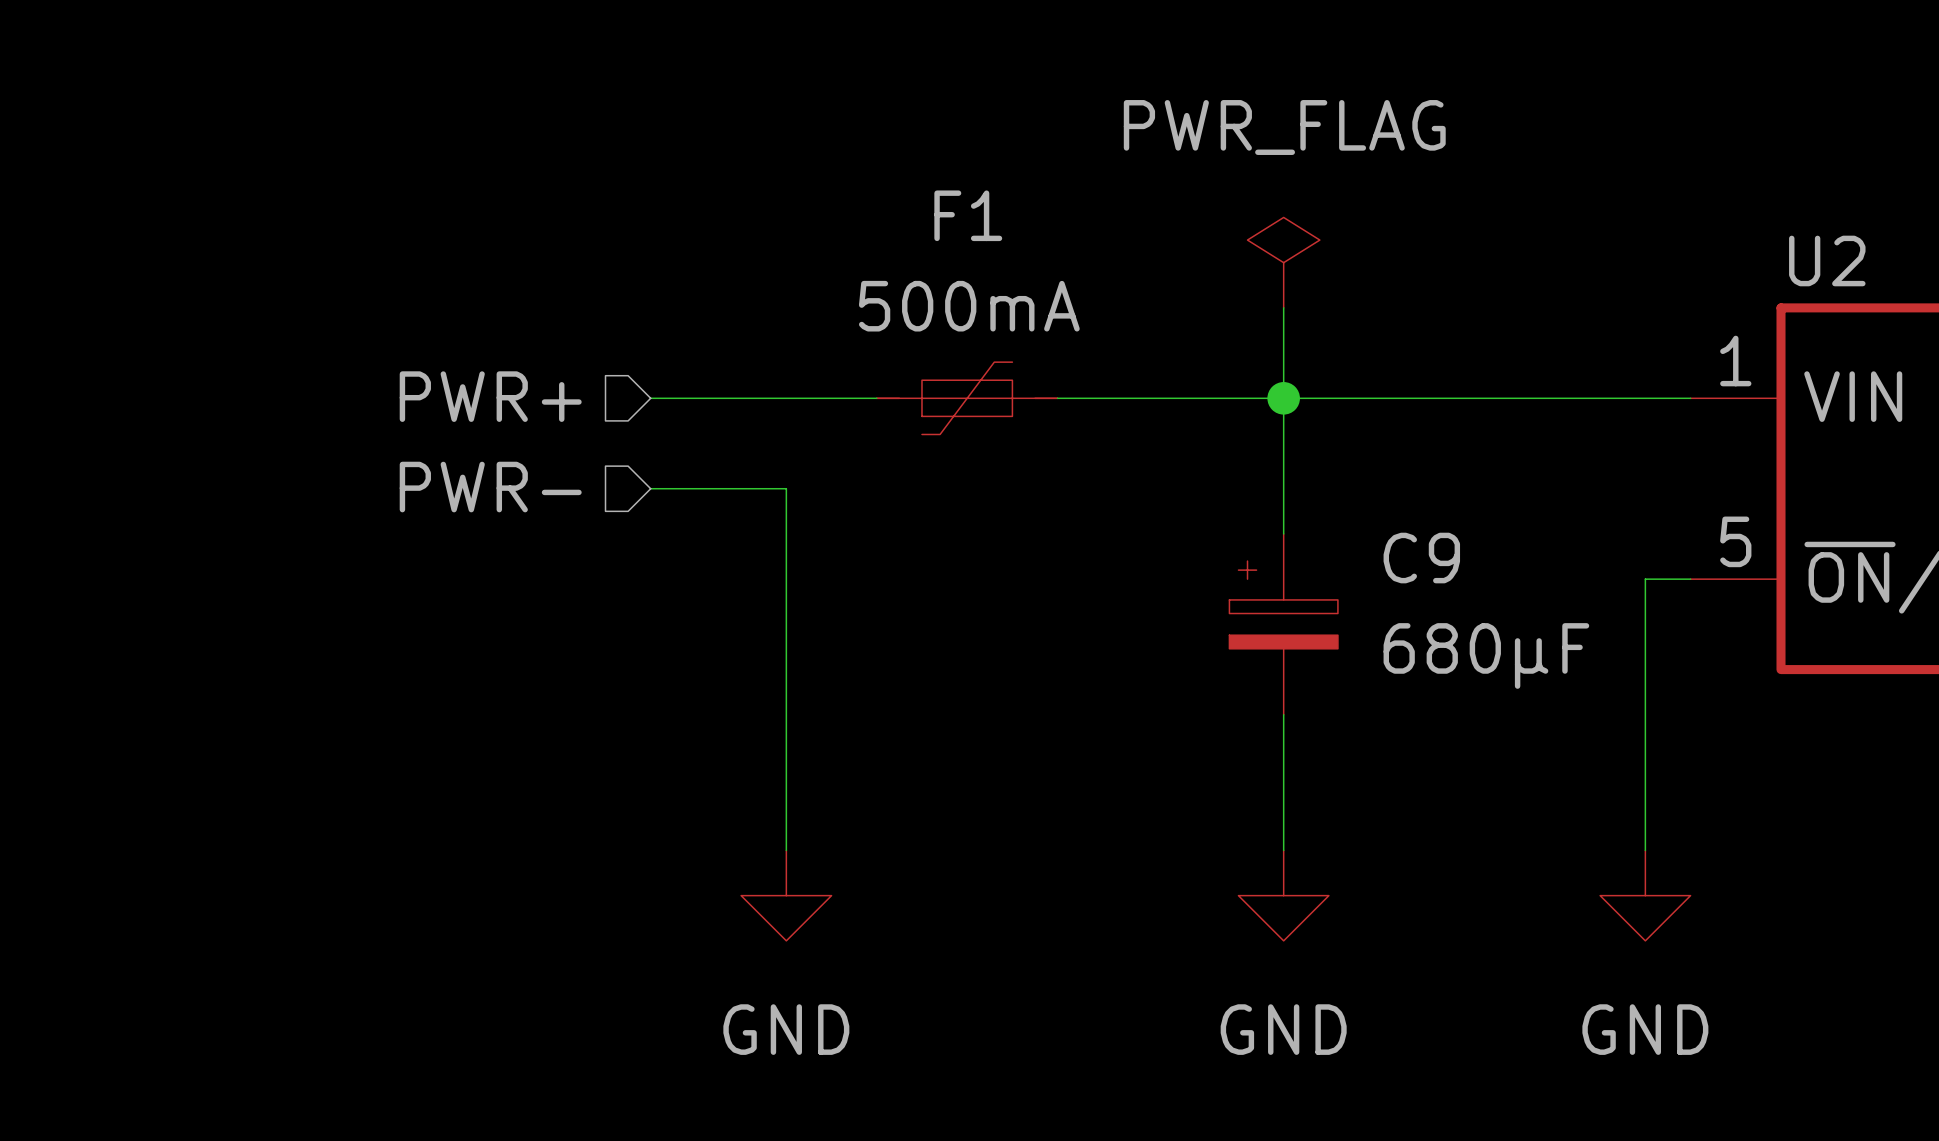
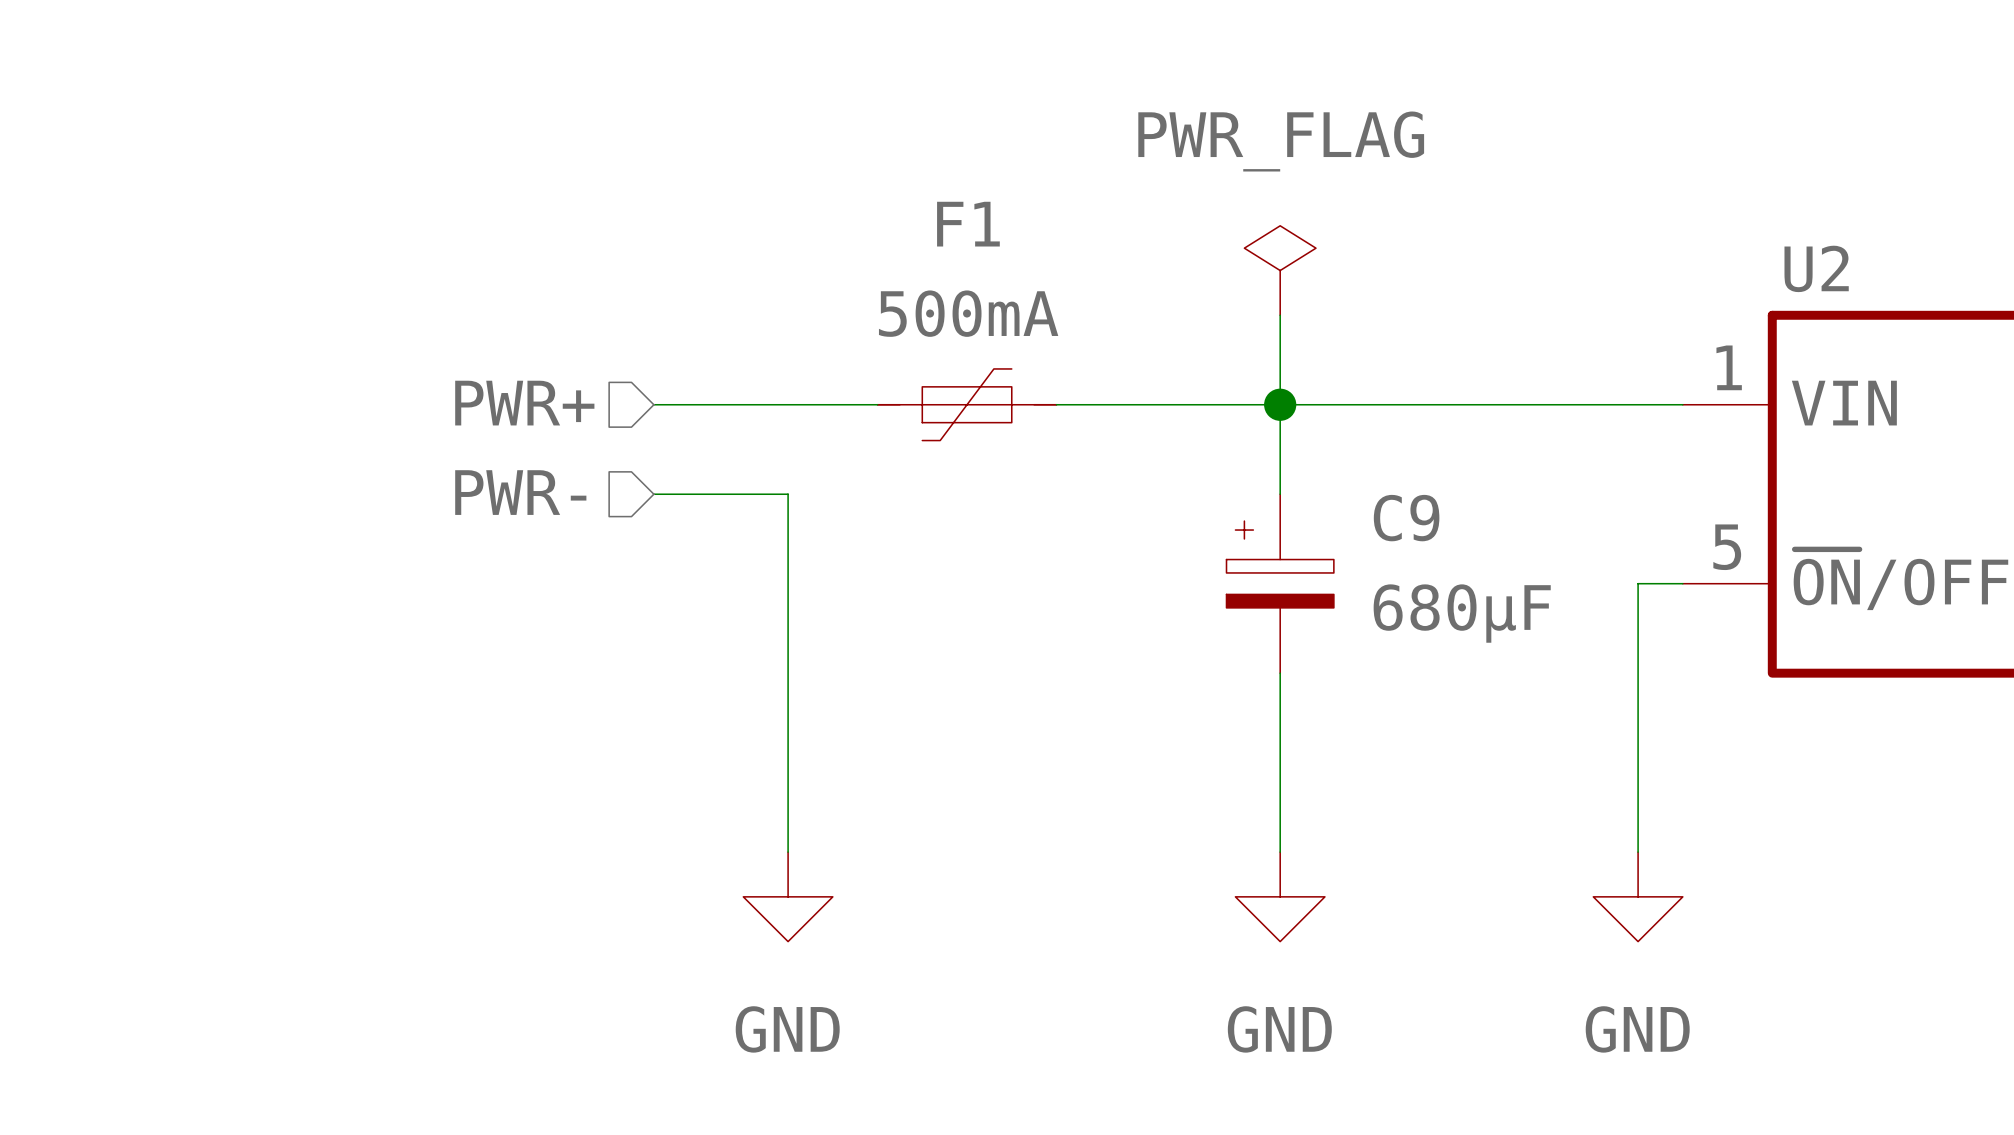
C9 position: (1283, 624) -> (1280, 583)

